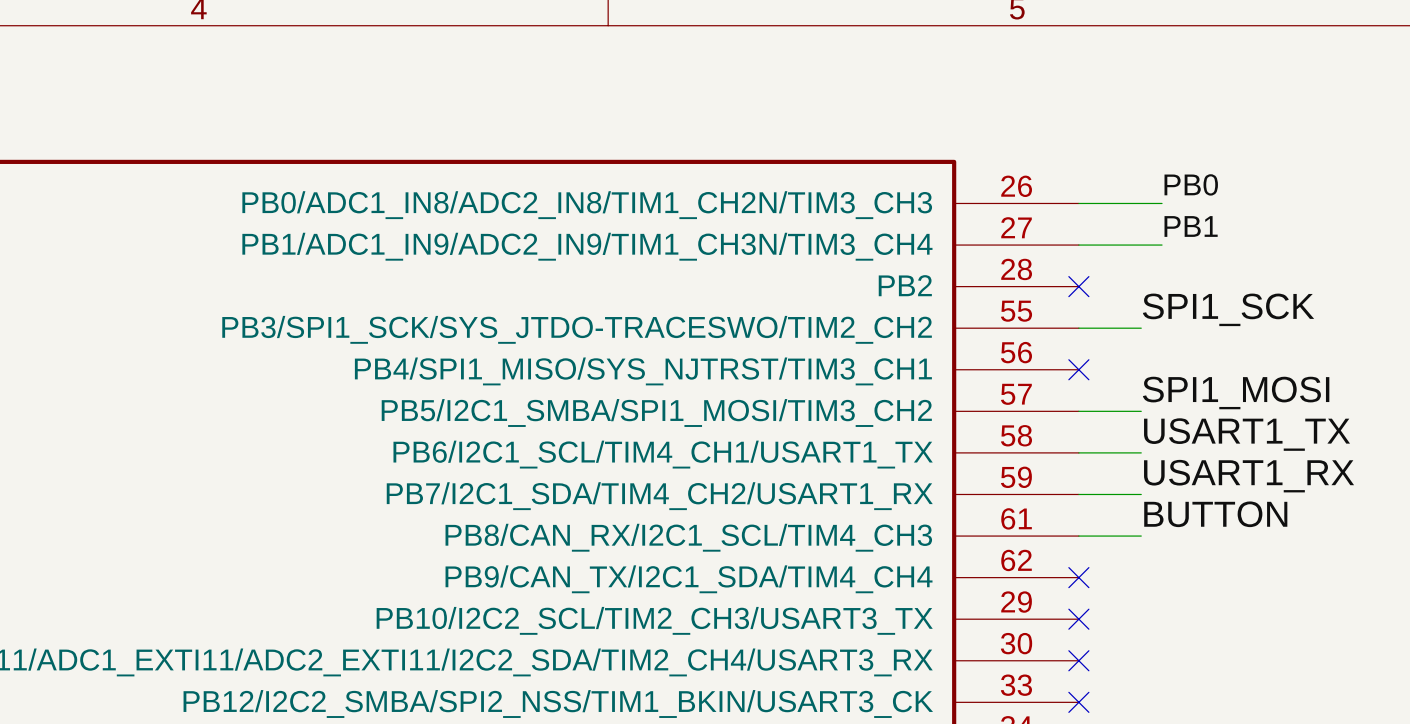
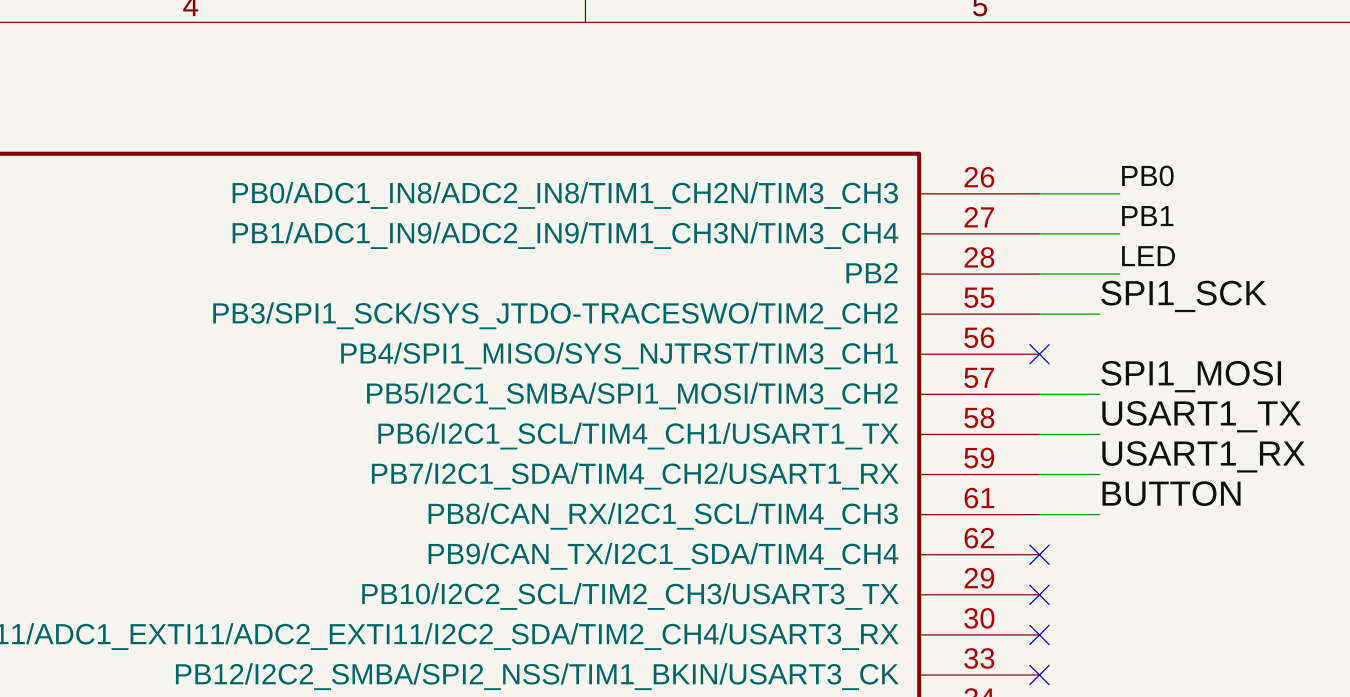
label: none -> LED (1148, 256)
wire: none -> (1039, 274) (1119, 274)
no-connect mark: (1078, 286) -> none

